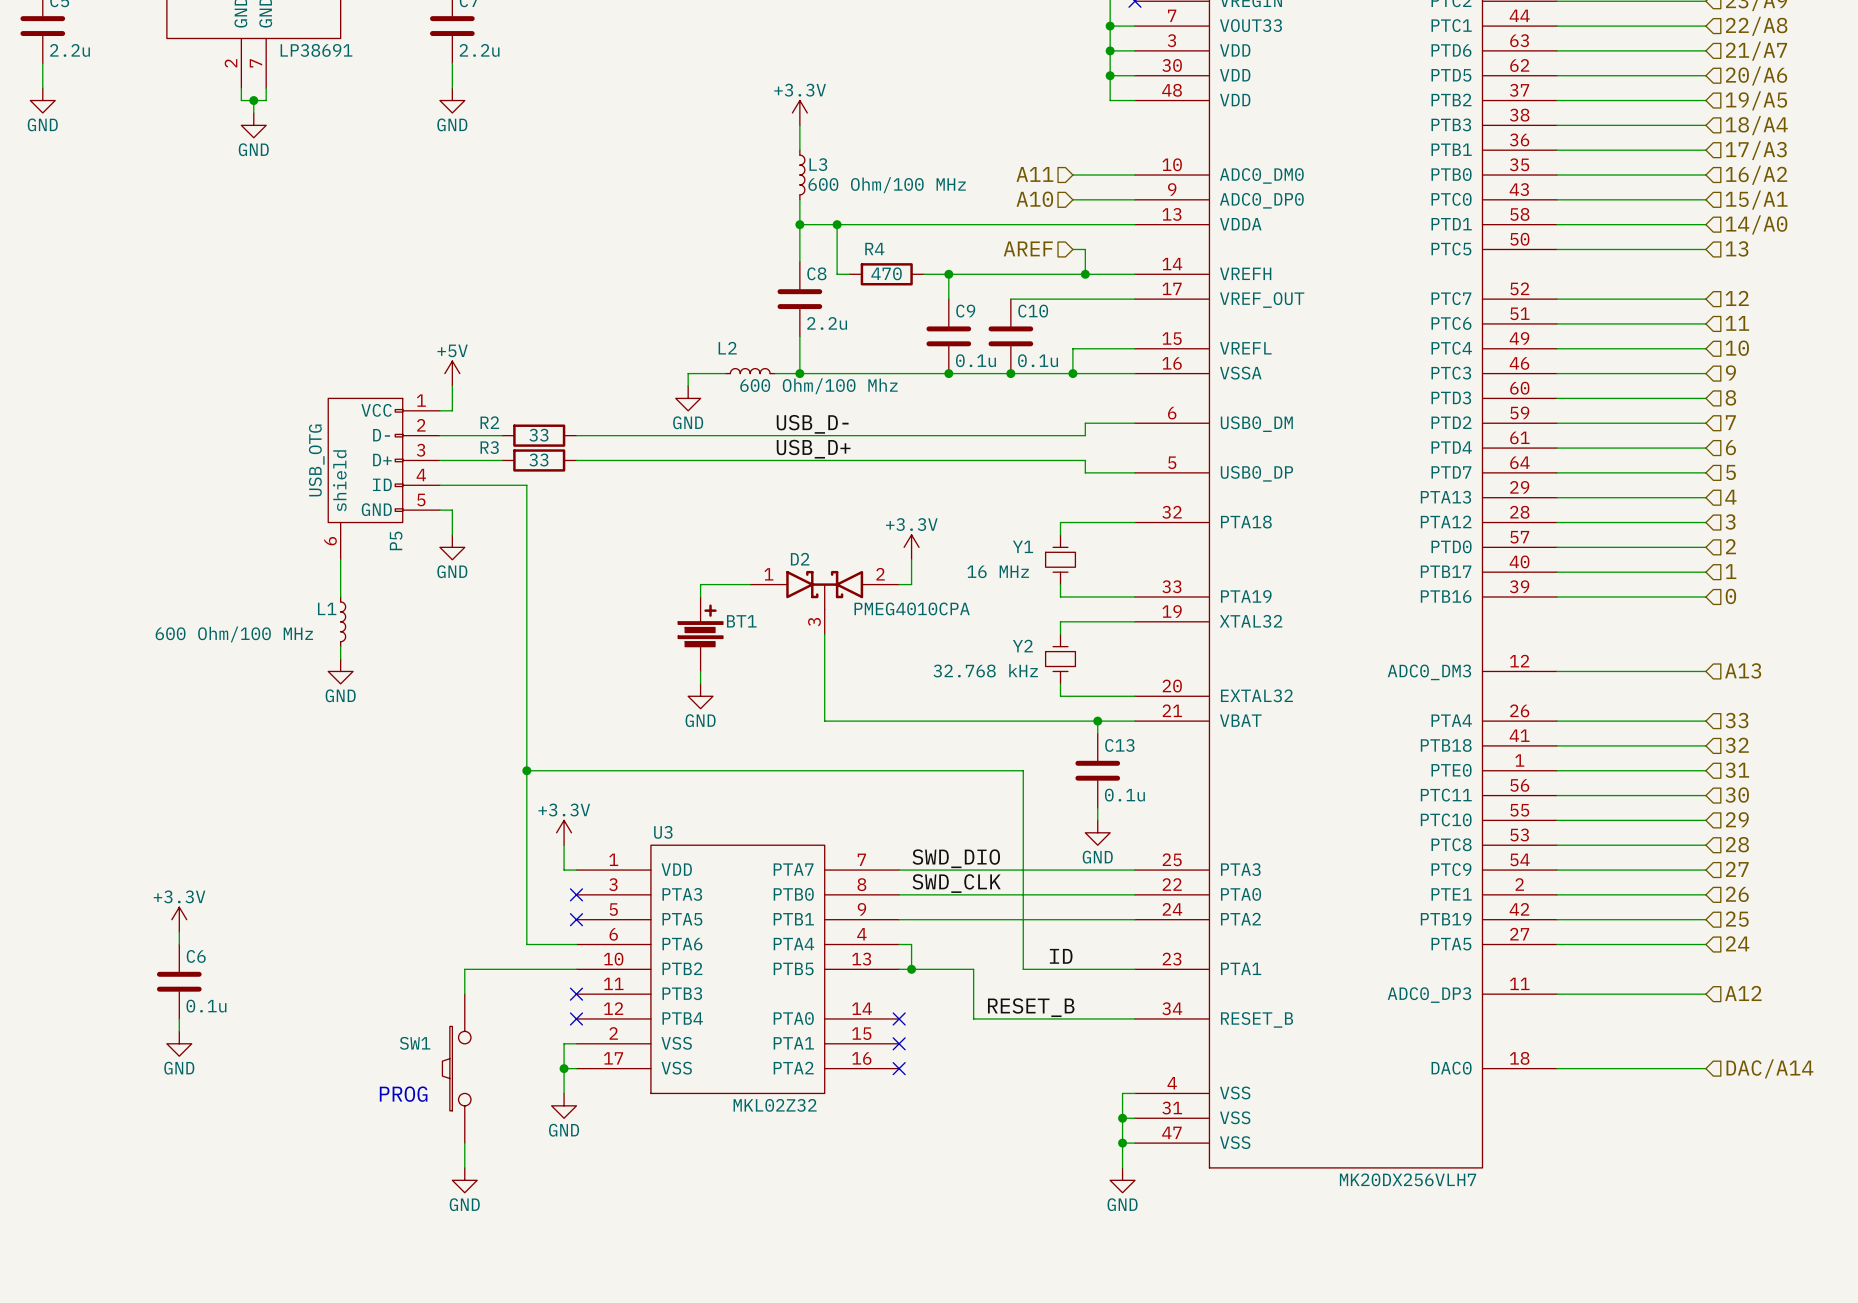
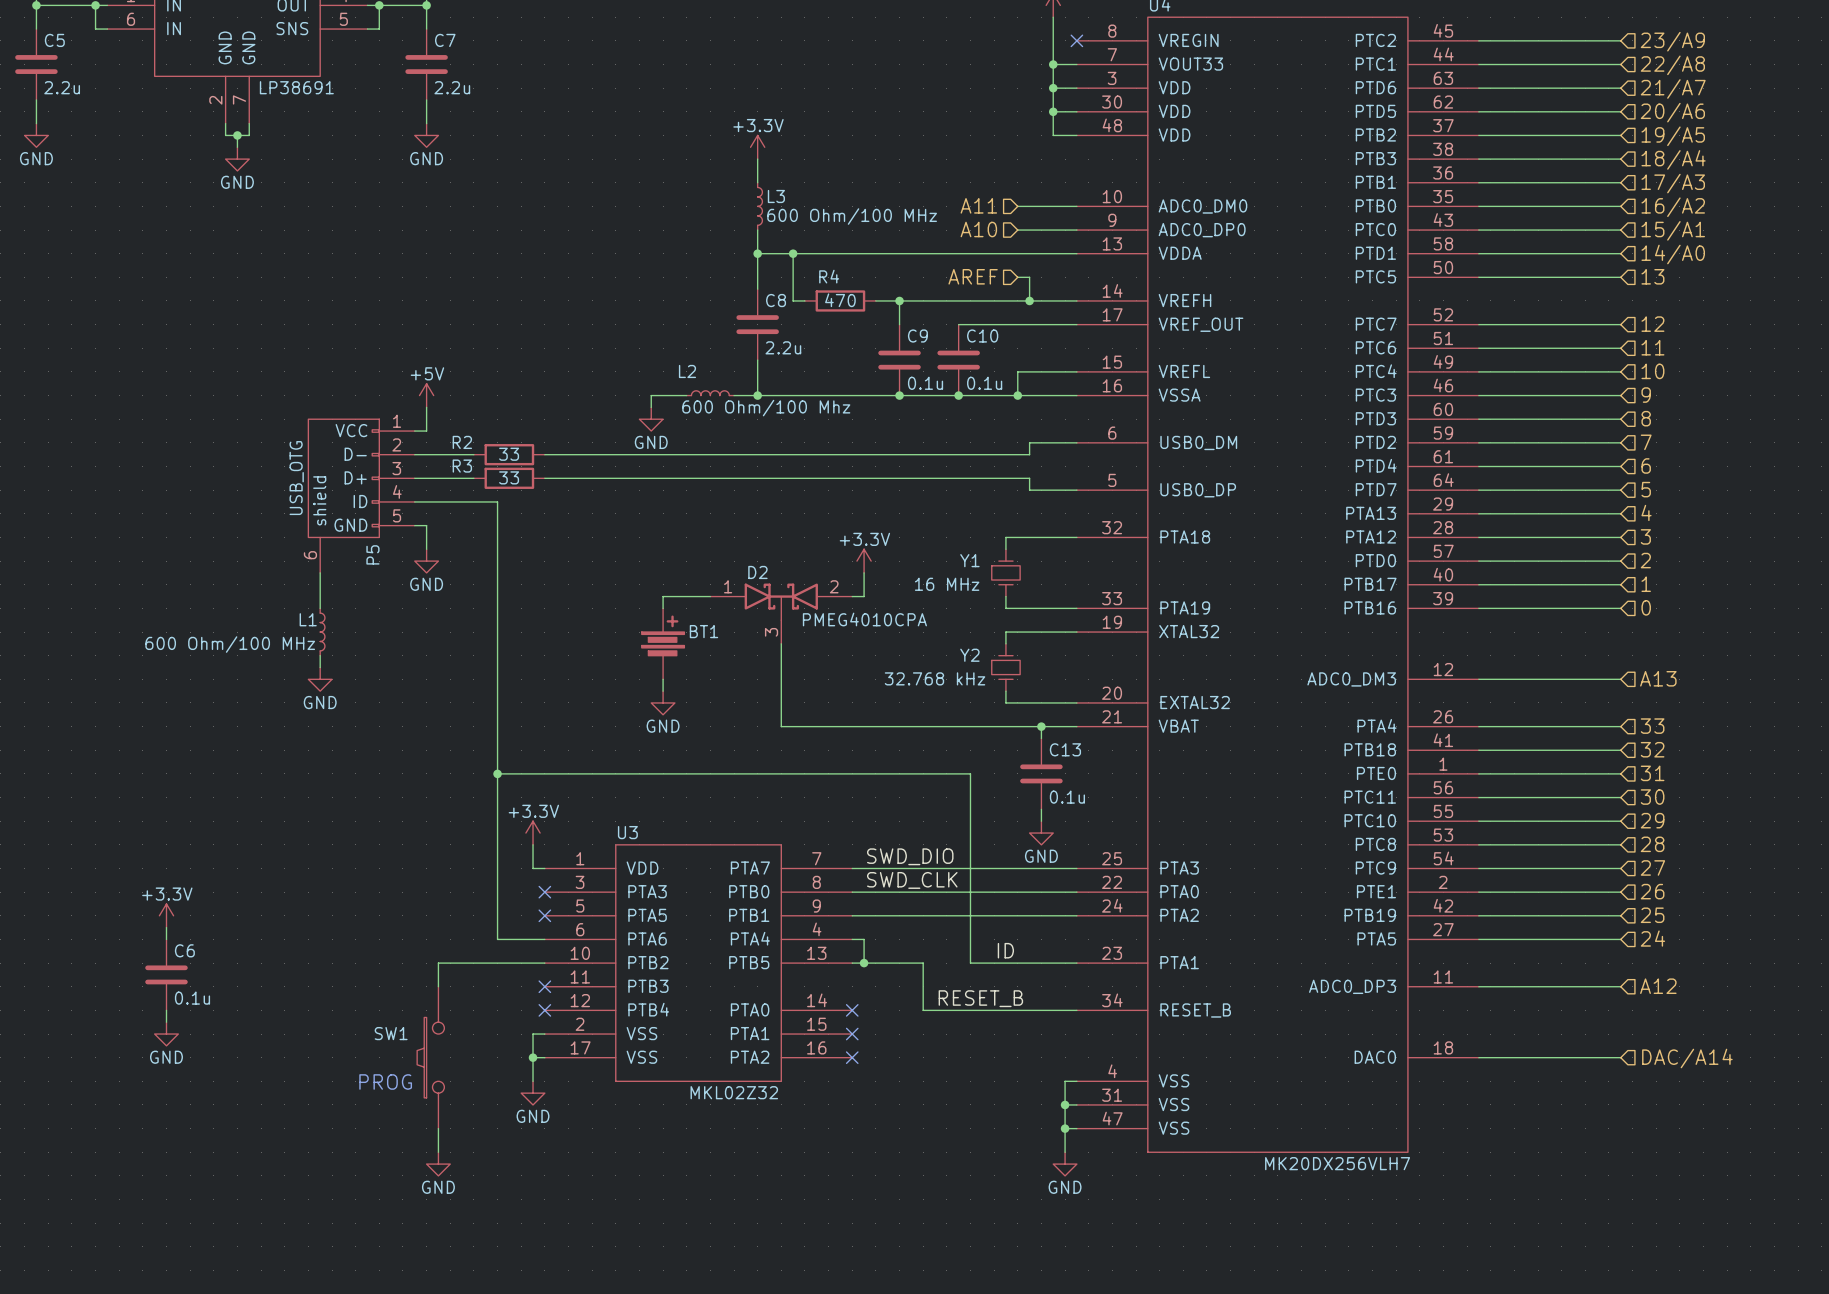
label: USB_D- (812, 424) -> none
label: USB_D+ (813, 449) -> none

